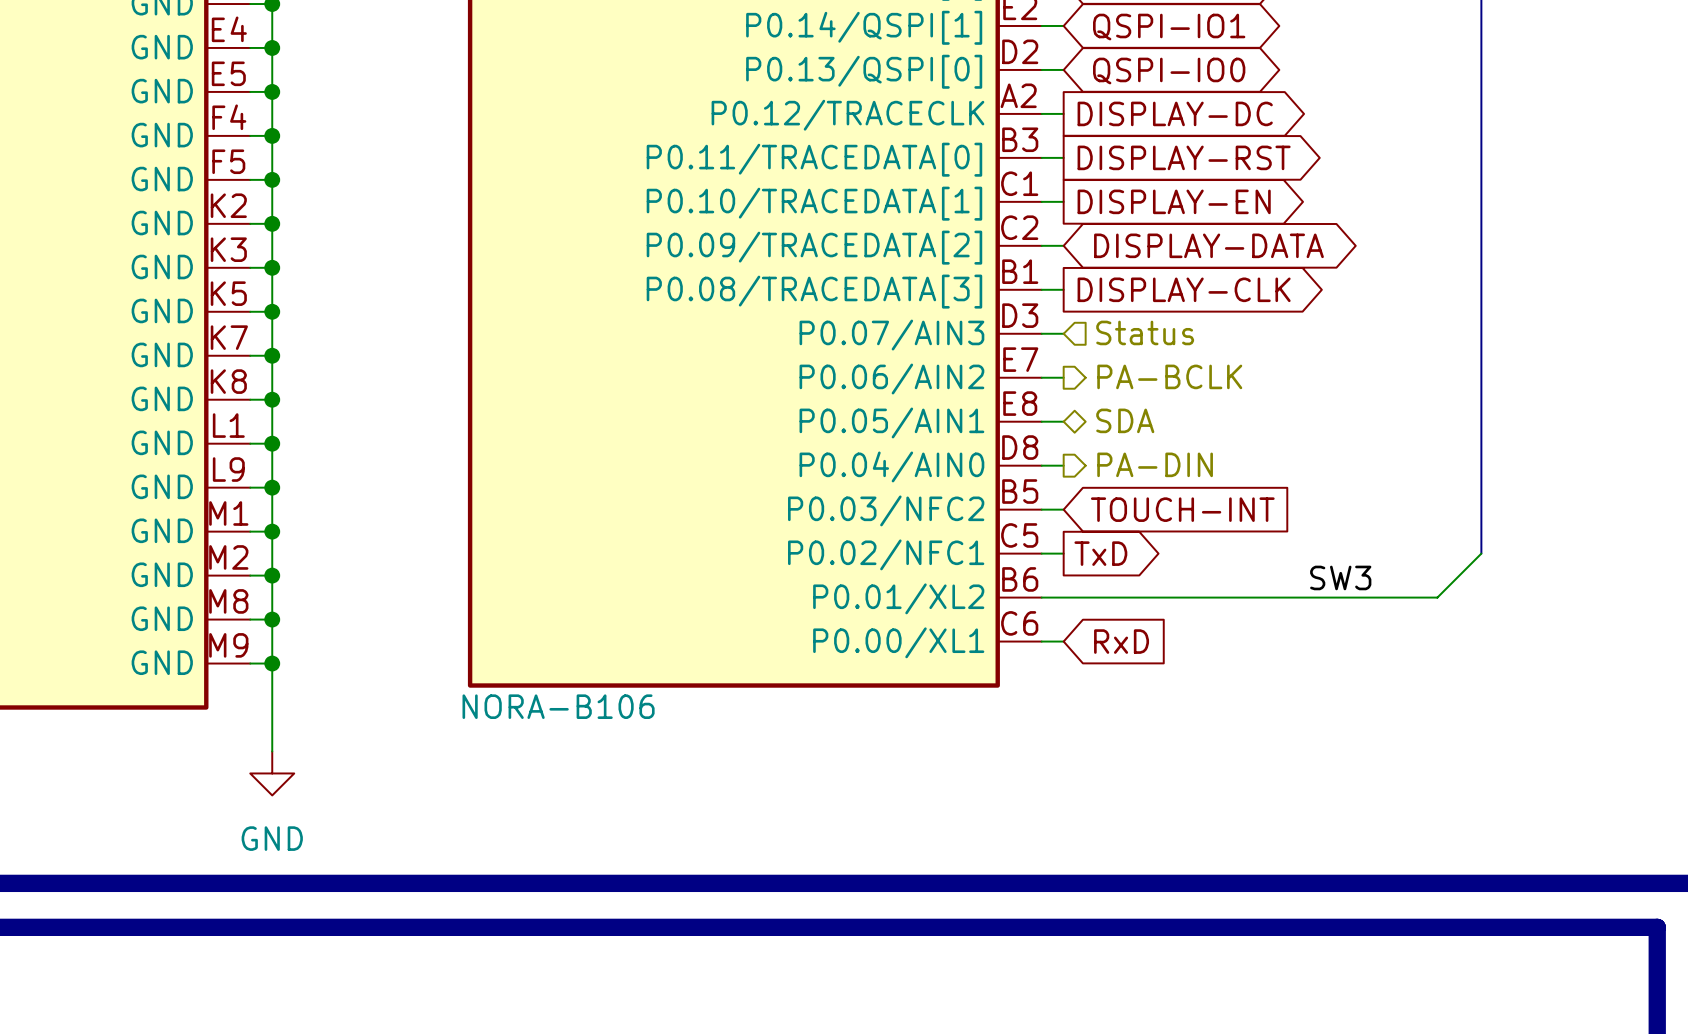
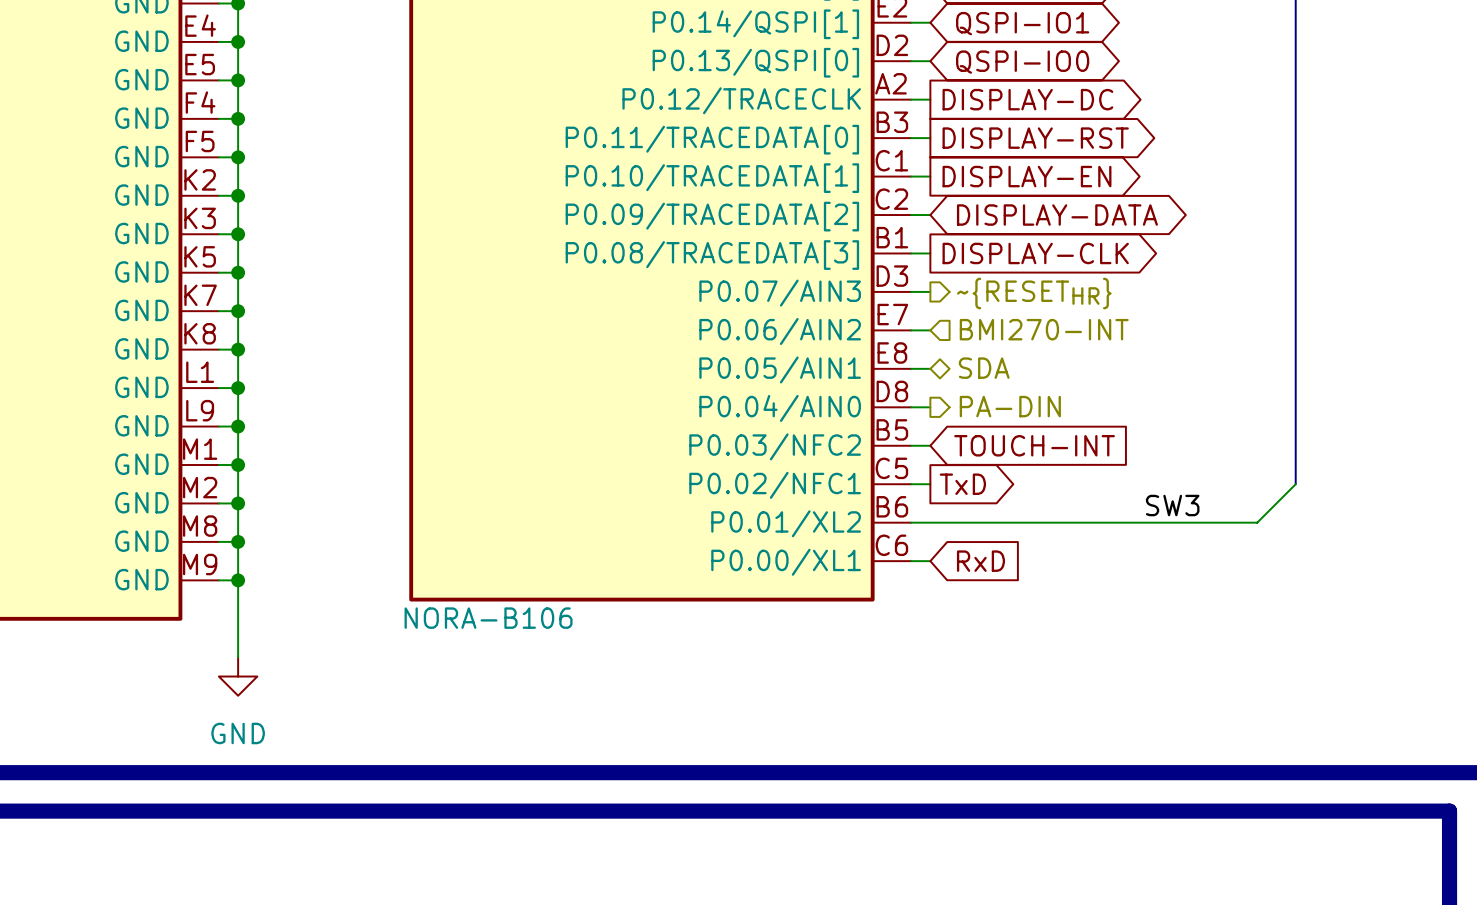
hierarchical label shape: input (1145, 332) -> output (1034, 293)
hierarchical label: Status (1145, 332) -> ~{RESETHR} (1034, 293)
hierarchical label shape: output (1169, 376) -> input (1044, 329)
hierarchical label: PA-BCLK (1169, 376) -> BMI270-INT (1044, 329)

